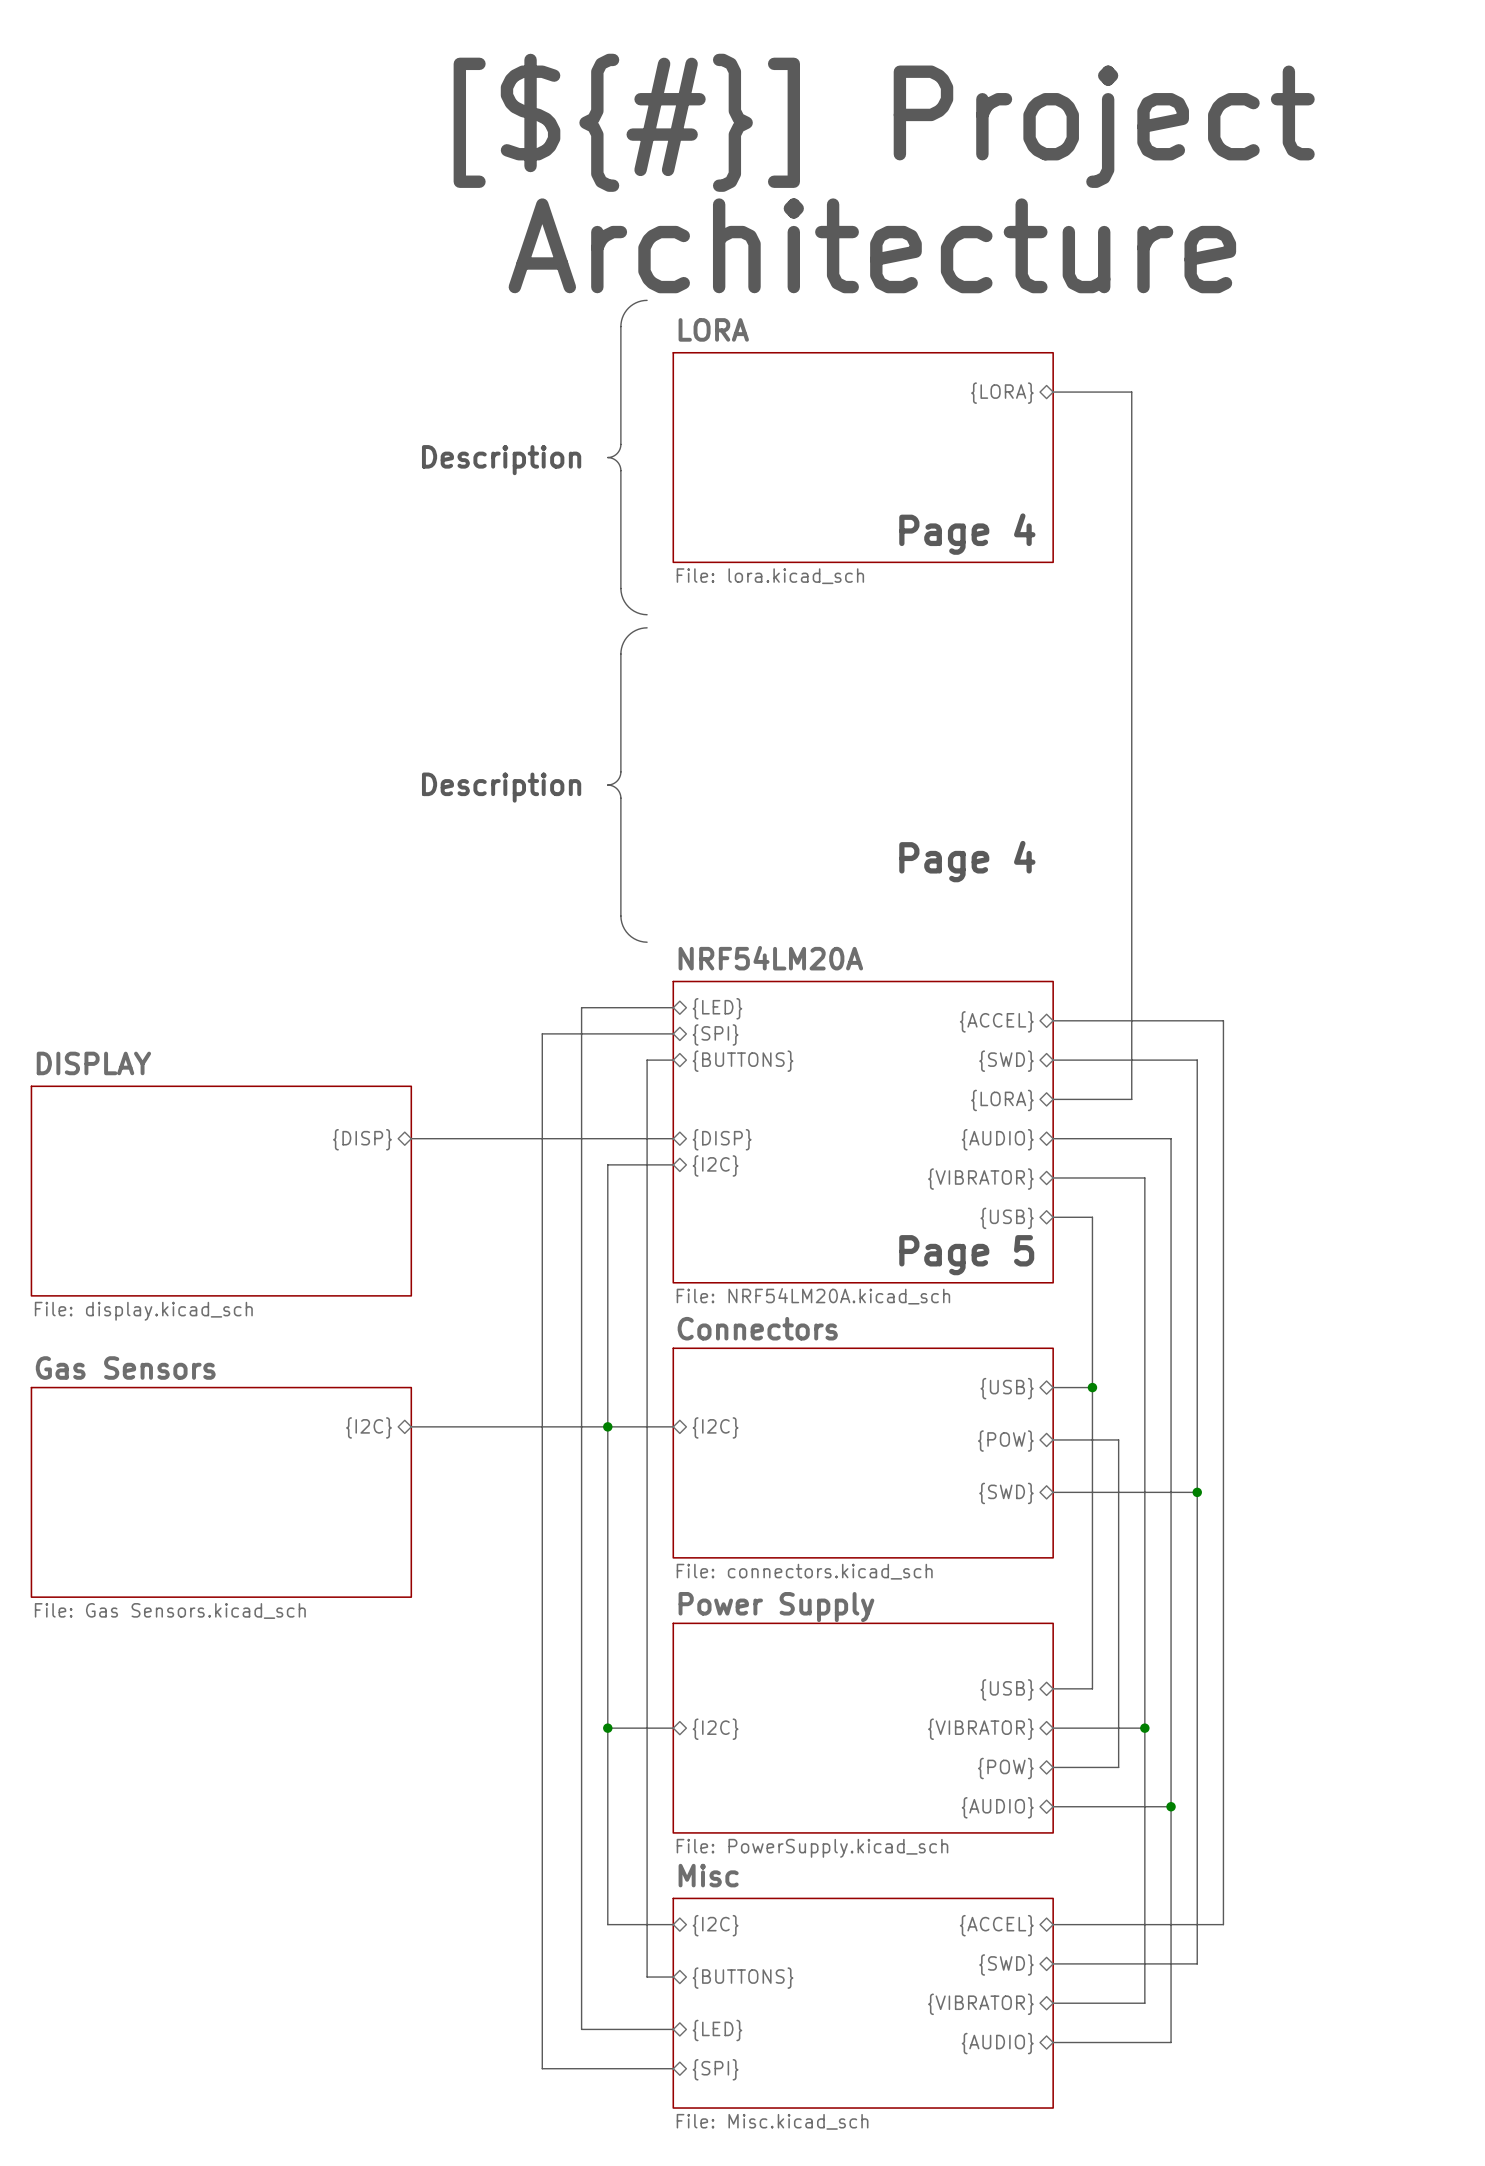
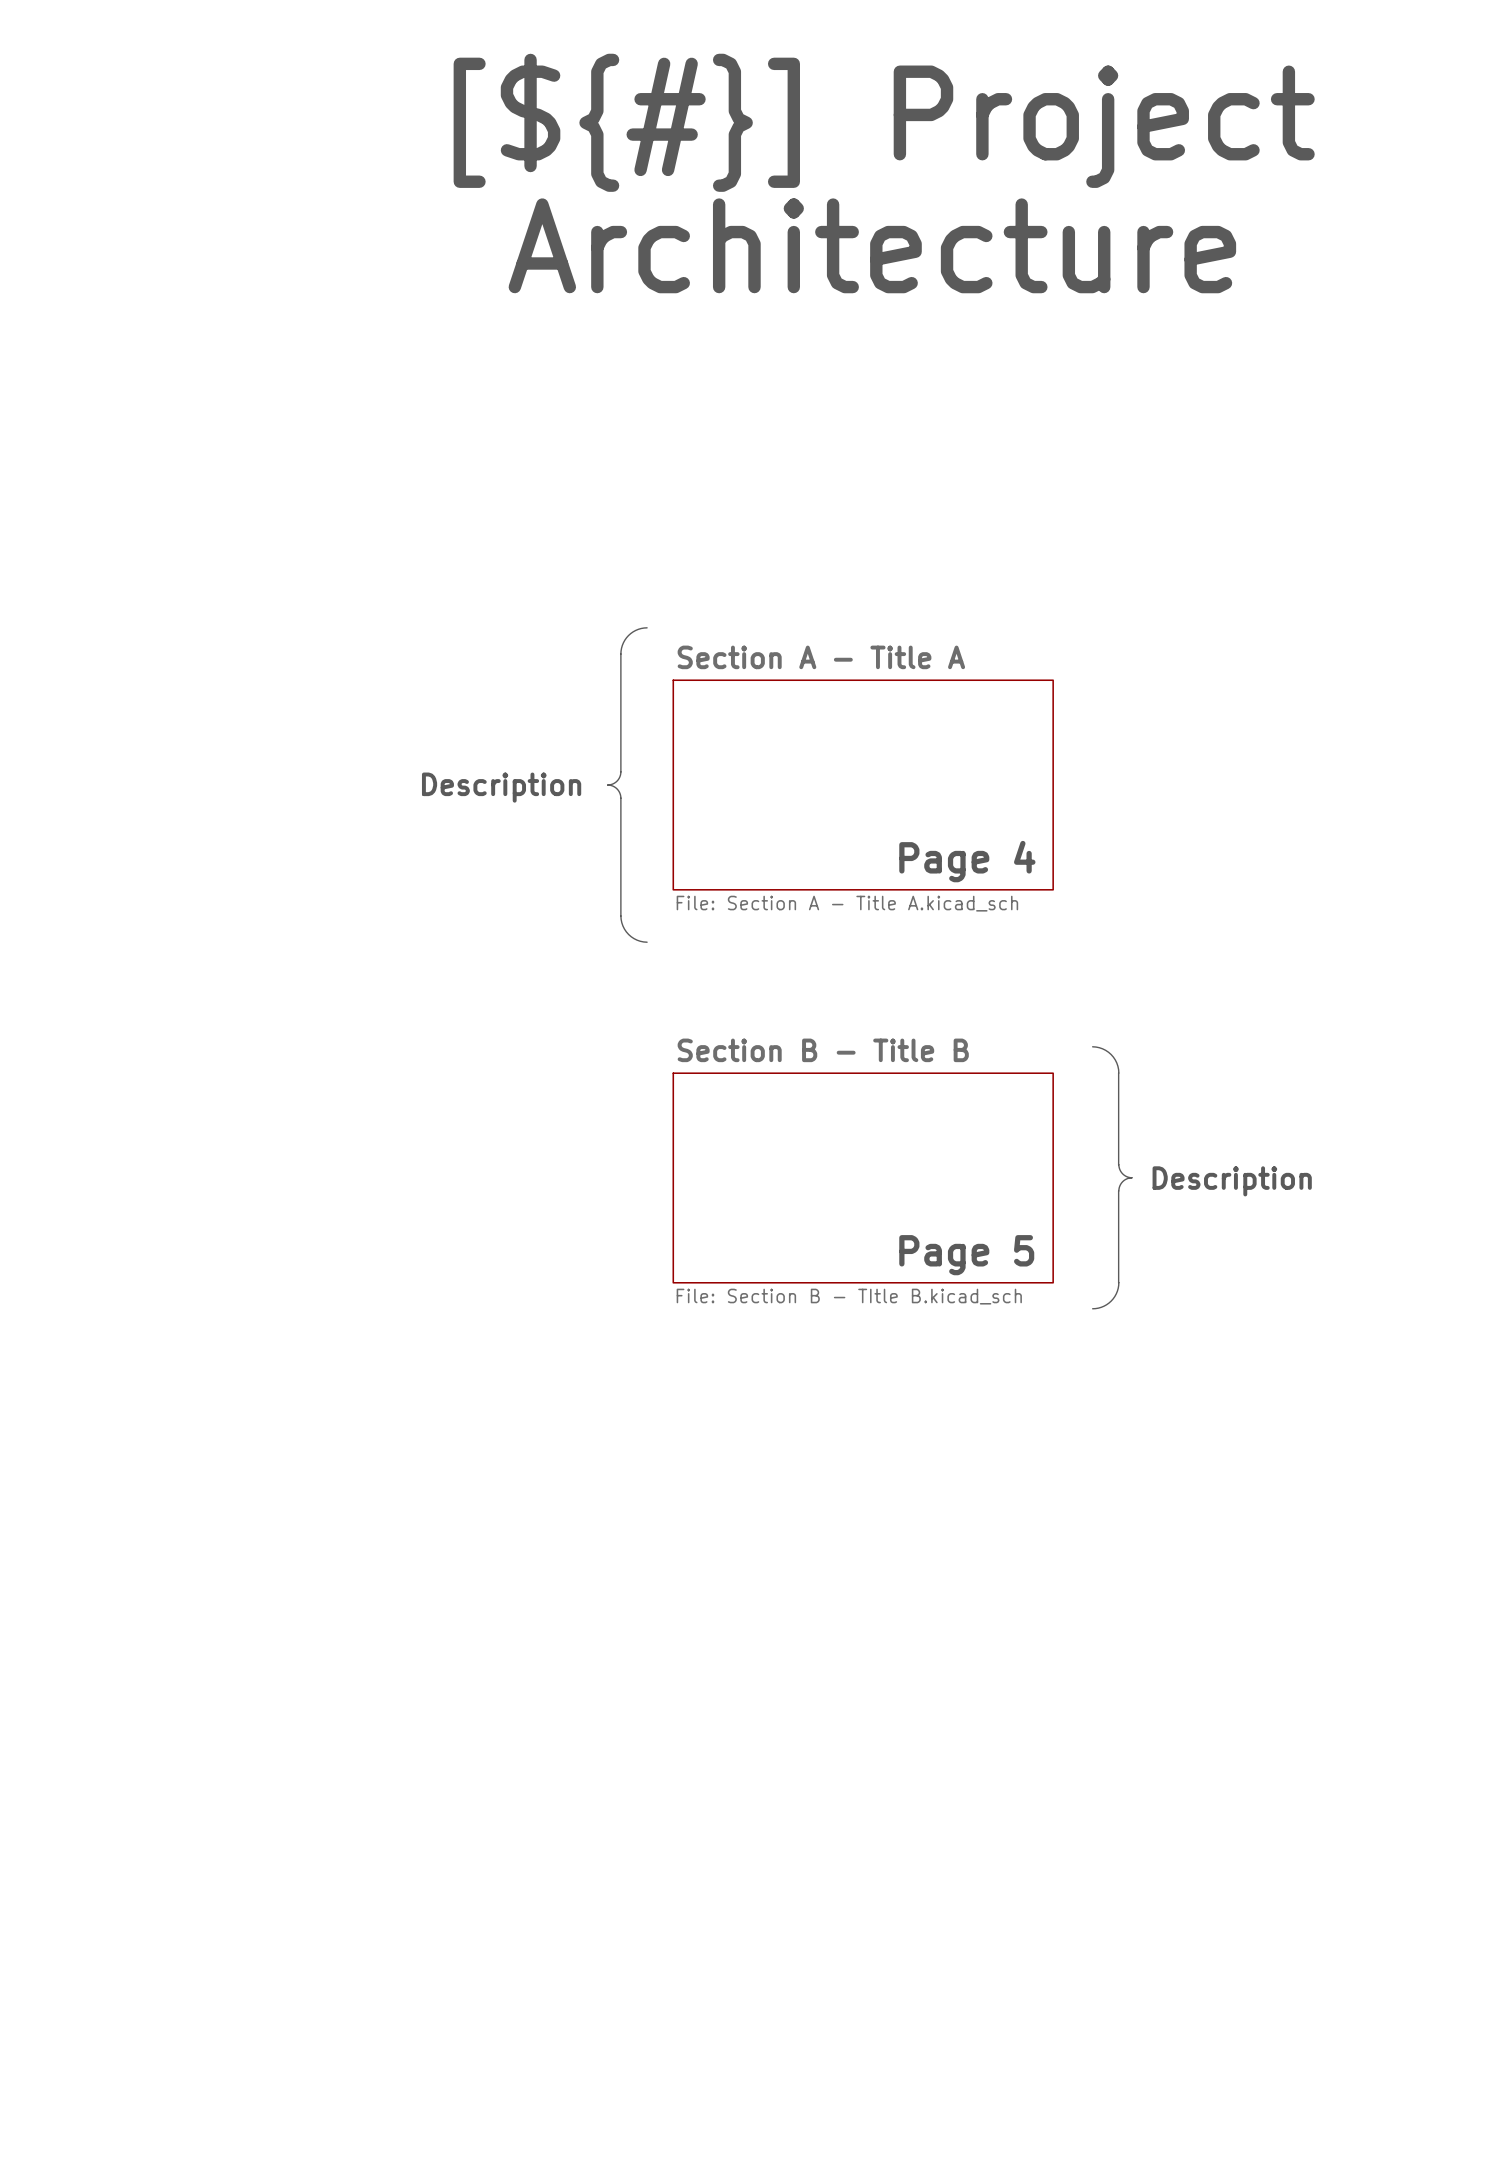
line: (647, 300) (630, 306) (621, 320) (620, 446) (615, 454) (607, 457) (617, 461) (620, 468) (621, 595) (631, 609) (647, 614) -> none
bus: (1053, 392) (1131, 392) (1131, 1099) (1053, 1099) -> none
sheet pin: {LORA} (1002, 393) -> none
sheet LORA: File: lora.kicad_sch (863, 457) -> none
text: Description (501, 460) -> none
text: Page 4 (967, 534) -> none
sheet Section A - Title A: none -> File: Section A - Title A.kicad_sch (863, 785)
bus: (673, 1007) (581, 1007) (581, 2029) (673, 2029) -> none
sheet pin: {LED} (717, 1008) -> none
bus: (1053, 1020) (1223, 1020) (1223, 1924) (1053, 1924) -> none
sheet pin: {ACCEL} (996, 1021) -> none
bus: (673, 1033) (542, 1033) (542, 2068) (673, 2068) -> none
sheet pin: {SPI} (715, 1034) -> none
line: none -> (1092, 1046) (1102, 1048) (1111, 1054) (1116, 1063) (1118, 1072)
bus: (673, 1060) (647, 1060) (647, 1977) (673, 1977) -> none
bus: (1053, 1060) (1197, 1060) (1197, 1963) (1053, 1963) -> none
sheet pin: {BUTTONS} (743, 1061) -> none
sheet pin: {SWD} (1006, 1061) -> none
line: none -> (1118, 1073) (1118, 1164)
sheet pin: {LORA} (1002, 1100) -> none
sheet NRF54LM20A: File: NRF54LM20A.kicad_sch (863, 1132) -> none
bus: (411, 1138) (673, 1138) -> none
bus: (1053, 1138) (1171, 1138) (1171, 2042) (1053, 2042) -> none
sheet pin: {DISP} (362, 1139) -> none
sheet pin: {DISP} (722, 1139) -> none
sheet pin: {AUDIO} (997, 1139) -> none
bus: (673, 1164) (607, 1164) (607, 1924) (673, 1924) -> none
line: none -> (1118, 1164) (1122, 1173) (1131, 1177) (1122, 1181) (1118, 1190)
sheet pin: {I2C} (715, 1165) -> none
sheet Section B - Title B: none -> File: Section B - TItle B.kicad_sch (863, 1177)
bus: (1053, 1177) (1144, 1177) (1144, 2003) (1053, 2003) -> none
sheet pin: {VIBRATOR} (980, 1179) -> none
text: none -> Description (1232, 1181)
sheet DISPLAY: File: display.kicad_sch (221, 1191) -> none
line: none -> (1118, 1191) (1118, 1282)
bus: (1053, 1217) (1092, 1217) (1092, 1688) (1053, 1688) -> none
sheet pin: {USB} (1007, 1218) -> none
line: none -> (1118, 1282) (1117, 1291) (1111, 1301) (1101, 1307) (1092, 1308)
bus: (1053, 1387) (1092, 1387) -> none
junction: (1092, 1387) -> none
sheet pin: {USB} (1007, 1388) -> none
bus: (411, 1426) (673, 1426) -> none
junction: (607, 1426) -> none
sheet pin: {I2C} (369, 1427) -> none
sheet pin: {I2C} (715, 1427) -> none
bus: (1053, 1439) (1118, 1439) (1118, 1767) (1053, 1767) -> none
sheet pin: {POW} (1005, 1441) -> none
sheet Connectors: File: connectors.kicad_sch (863, 1453) -> none
sheet Gas Sensors: File: Gas Sensors.kicad_sch (221, 1492) -> none
bus: (1053, 1492) (1197, 1492) -> none
junction: (1197, 1492) -> none
sheet pin: {SWD} (1006, 1493) -> none
sheet pin: {USB} (1007, 1689) -> none
bus: (607, 1728) (673, 1728) -> none
junction: (607, 1728) -> none
sheet Power Supply: File: PowerSupply.kicad_sch (863, 1728) -> none
bus: (1053, 1728) (1144, 1728) -> none
junction: (1144, 1728) -> none
sheet pin: {I2C} (715, 1729) -> none
sheet pin: {VIBRATOR} (980, 1729) -> none
sheet pin: {POW} (1005, 1768) -> none
bus: (1053, 1806) (1171, 1806) -> none
junction: (1171, 1806) -> none
sheet pin: {AUDIO} (997, 1807) -> none
sheet pin: {I2C} (715, 1925) -> none
sheet pin: {ACCEL} (996, 1925) -> none
sheet pin: {SWD} (1006, 1964) -> none
sheet pin: {BUTTONS} (743, 1978) -> none
sheet Misc: File: Misc.kicad_sch (863, 2003) -> none
sheet pin: {VIBRATOR} (980, 2004) -> none
sheet pin: {LED} (717, 2030) -> none
sheet pin: {AUDIO} (997, 2043) -> none
sheet pin: {SPI} (715, 2069) -> none

